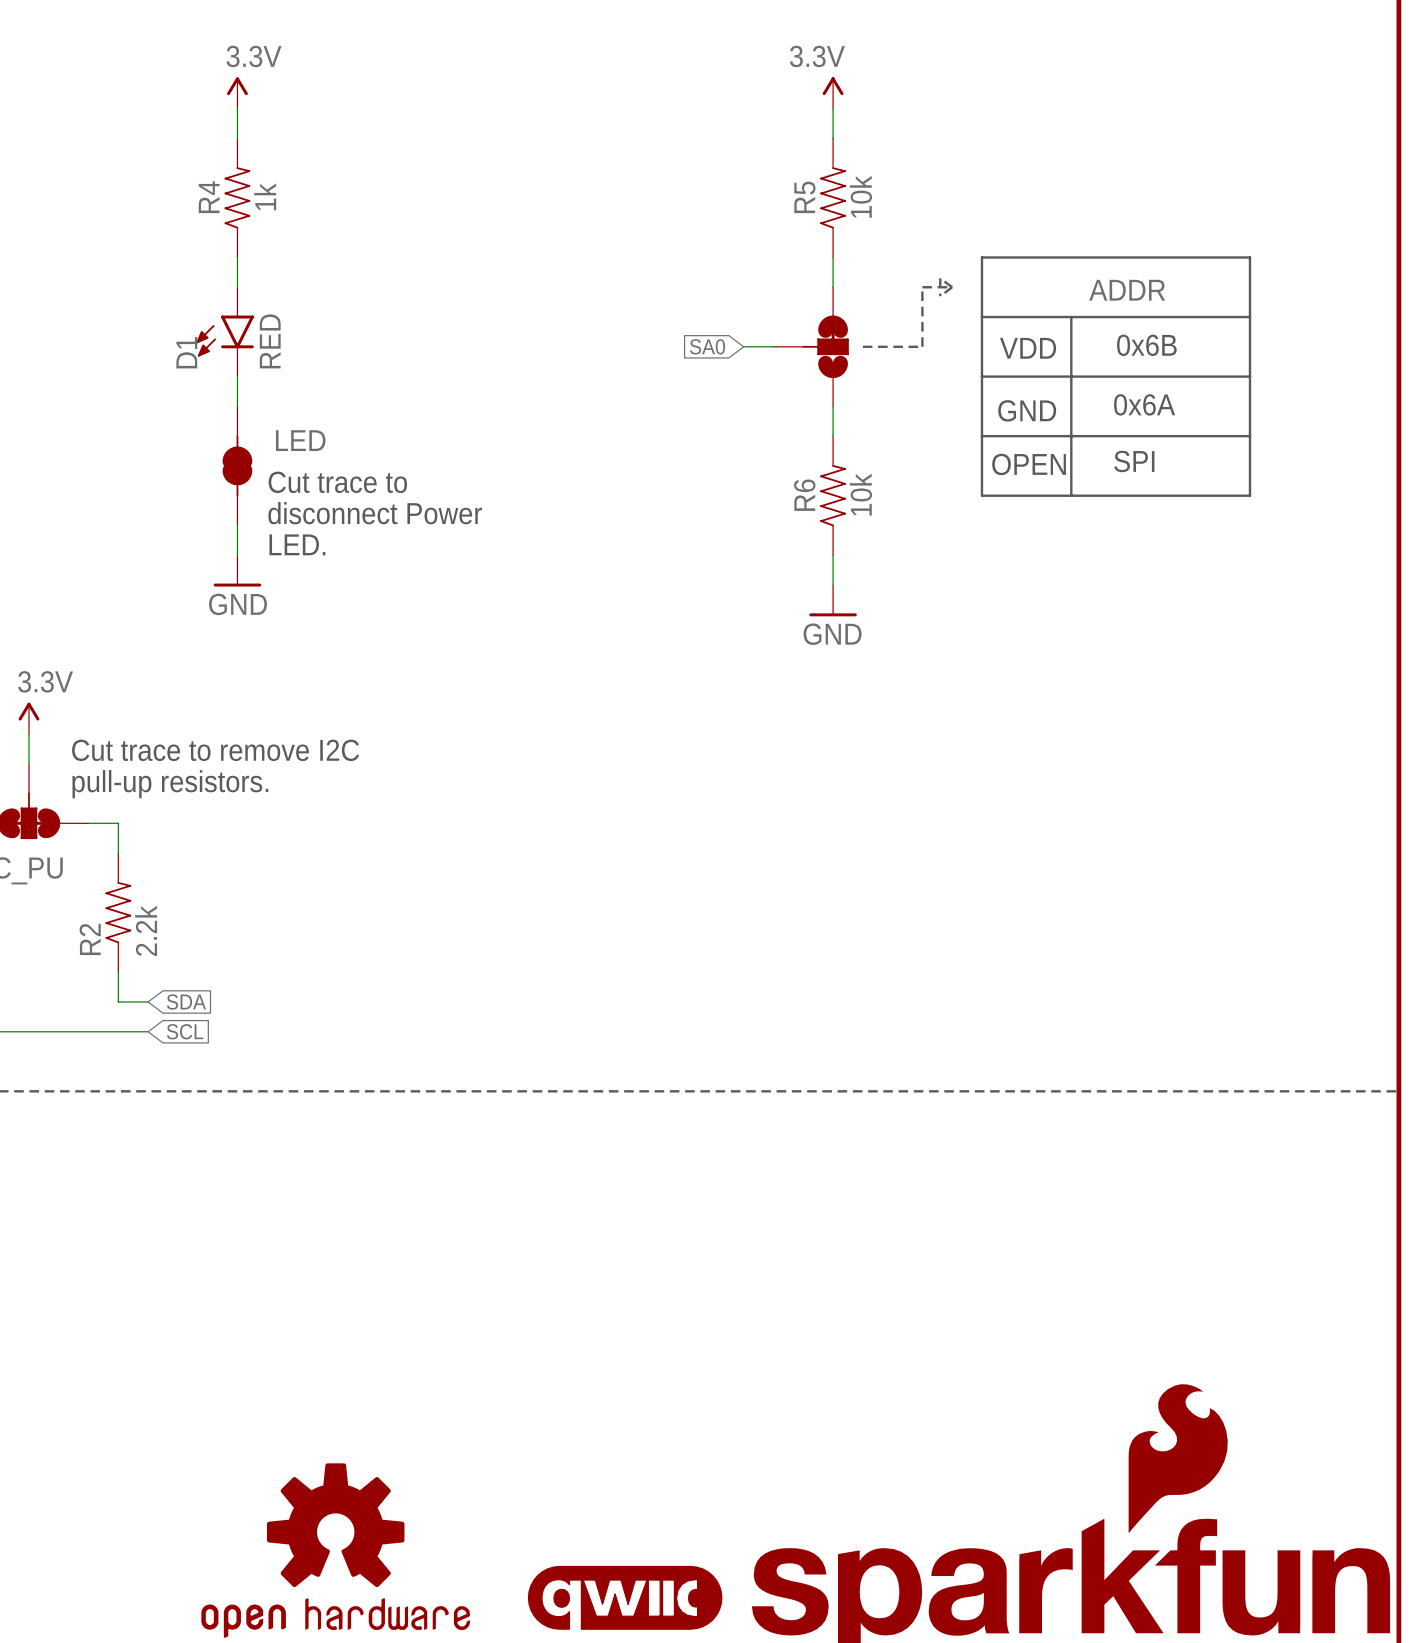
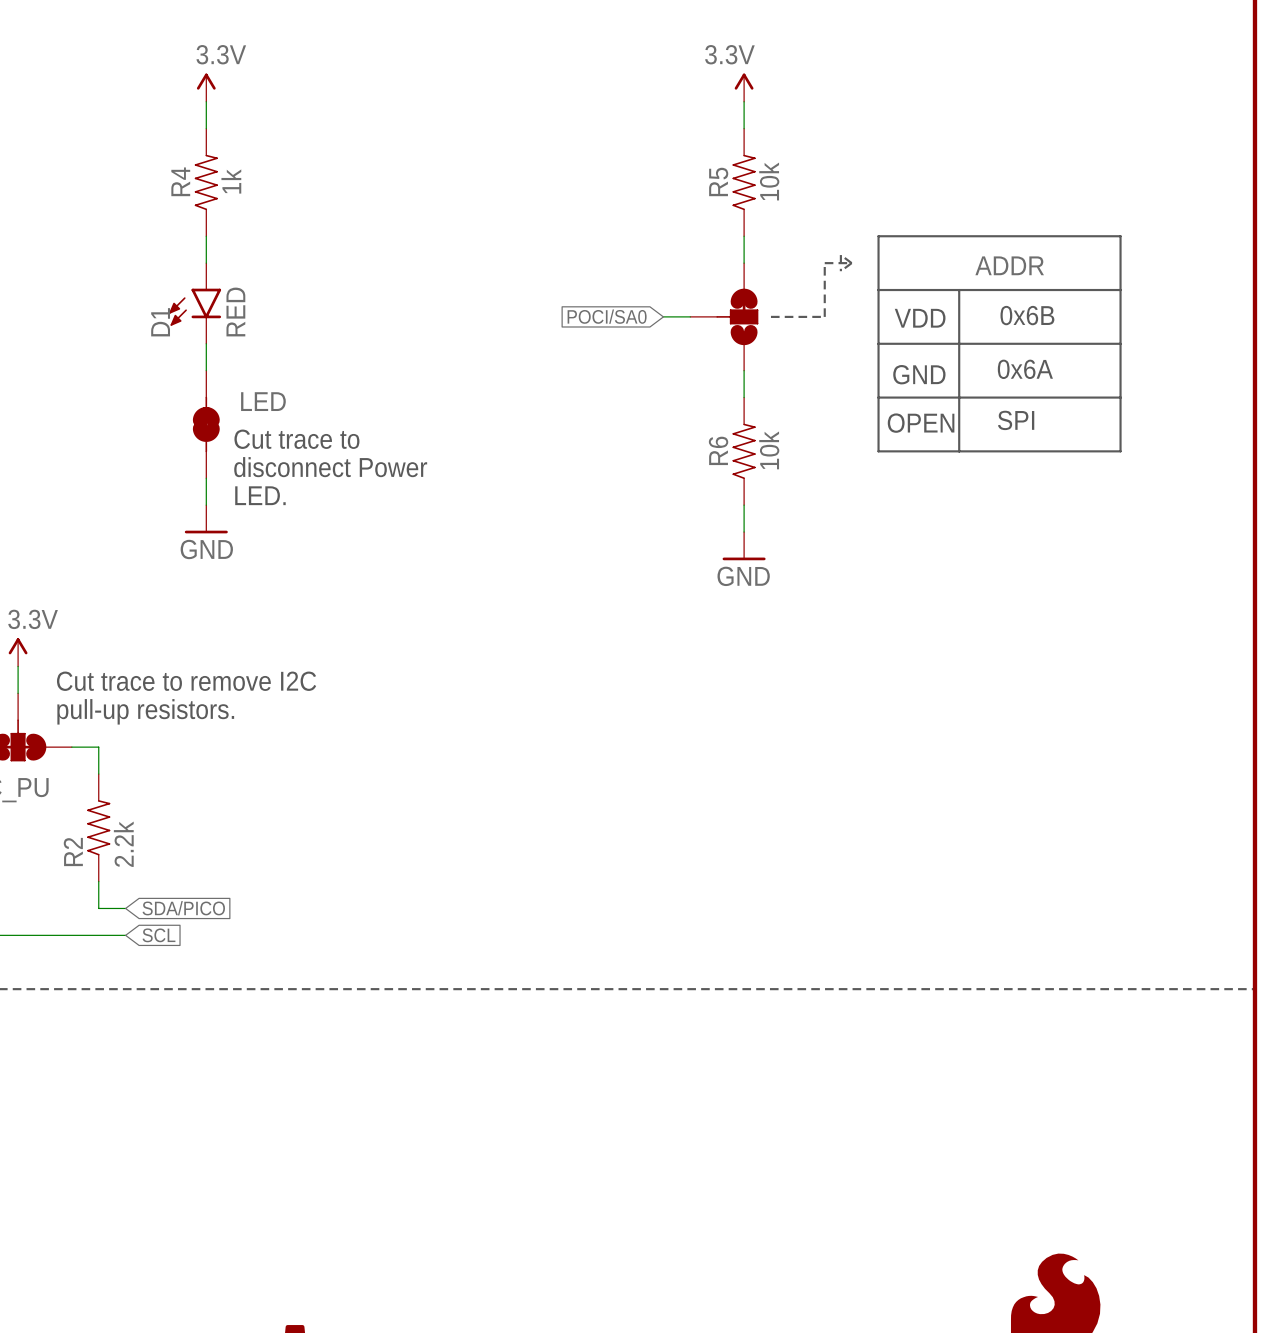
global label: SA0 (707, 346) -> POCI/SA0 (607, 316)
global label: SDA (186, 1001) -> SDA/PICO (183, 908)

